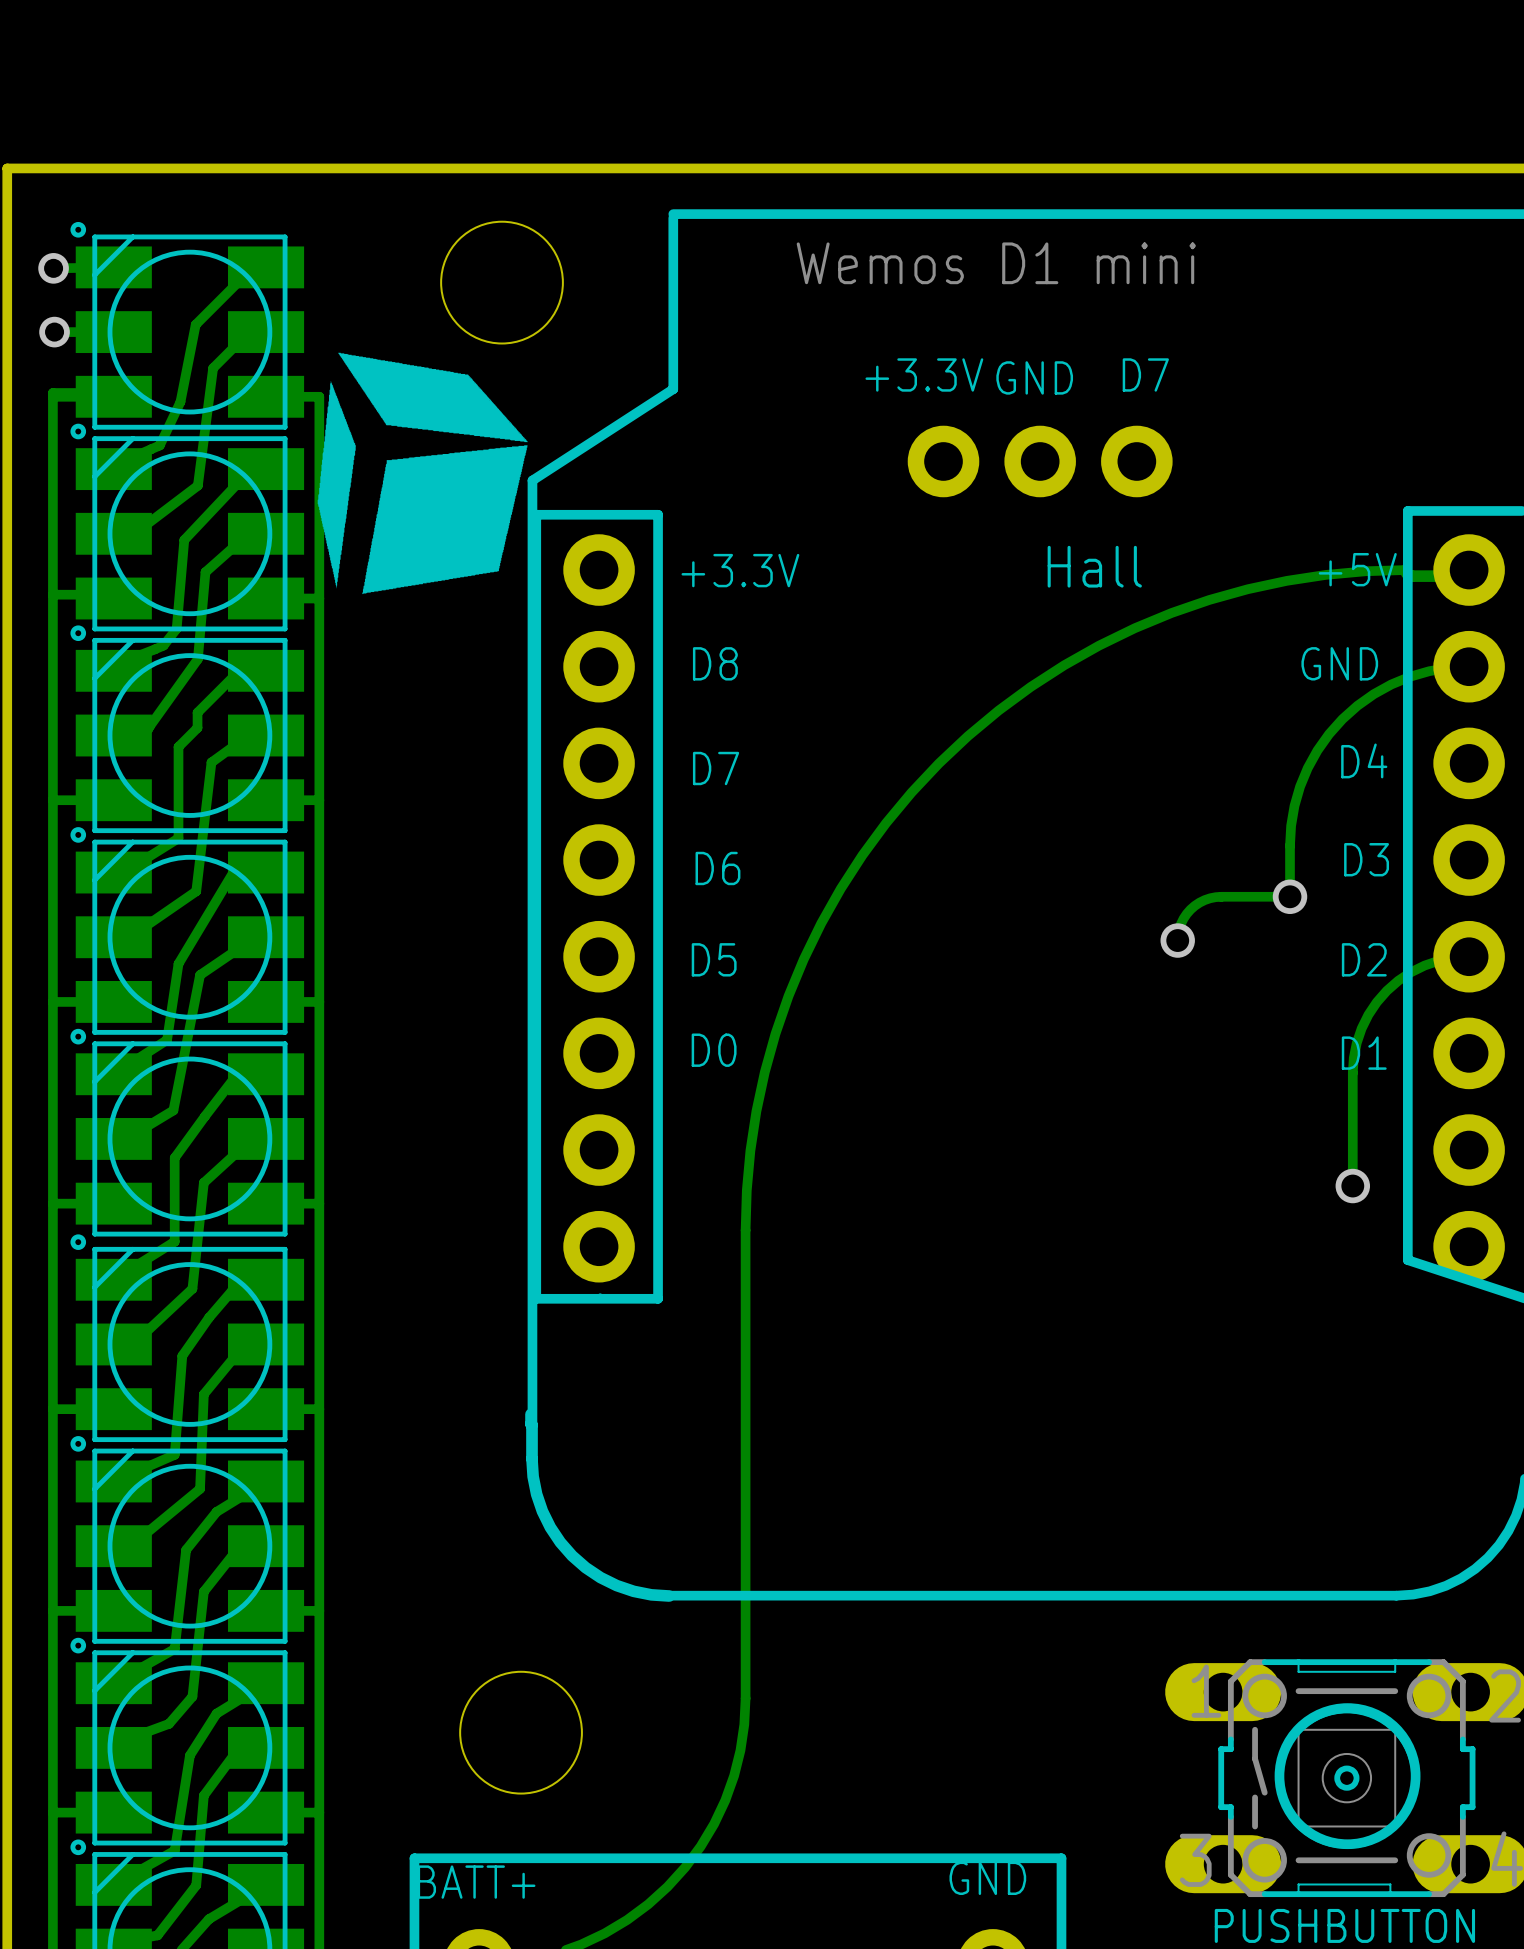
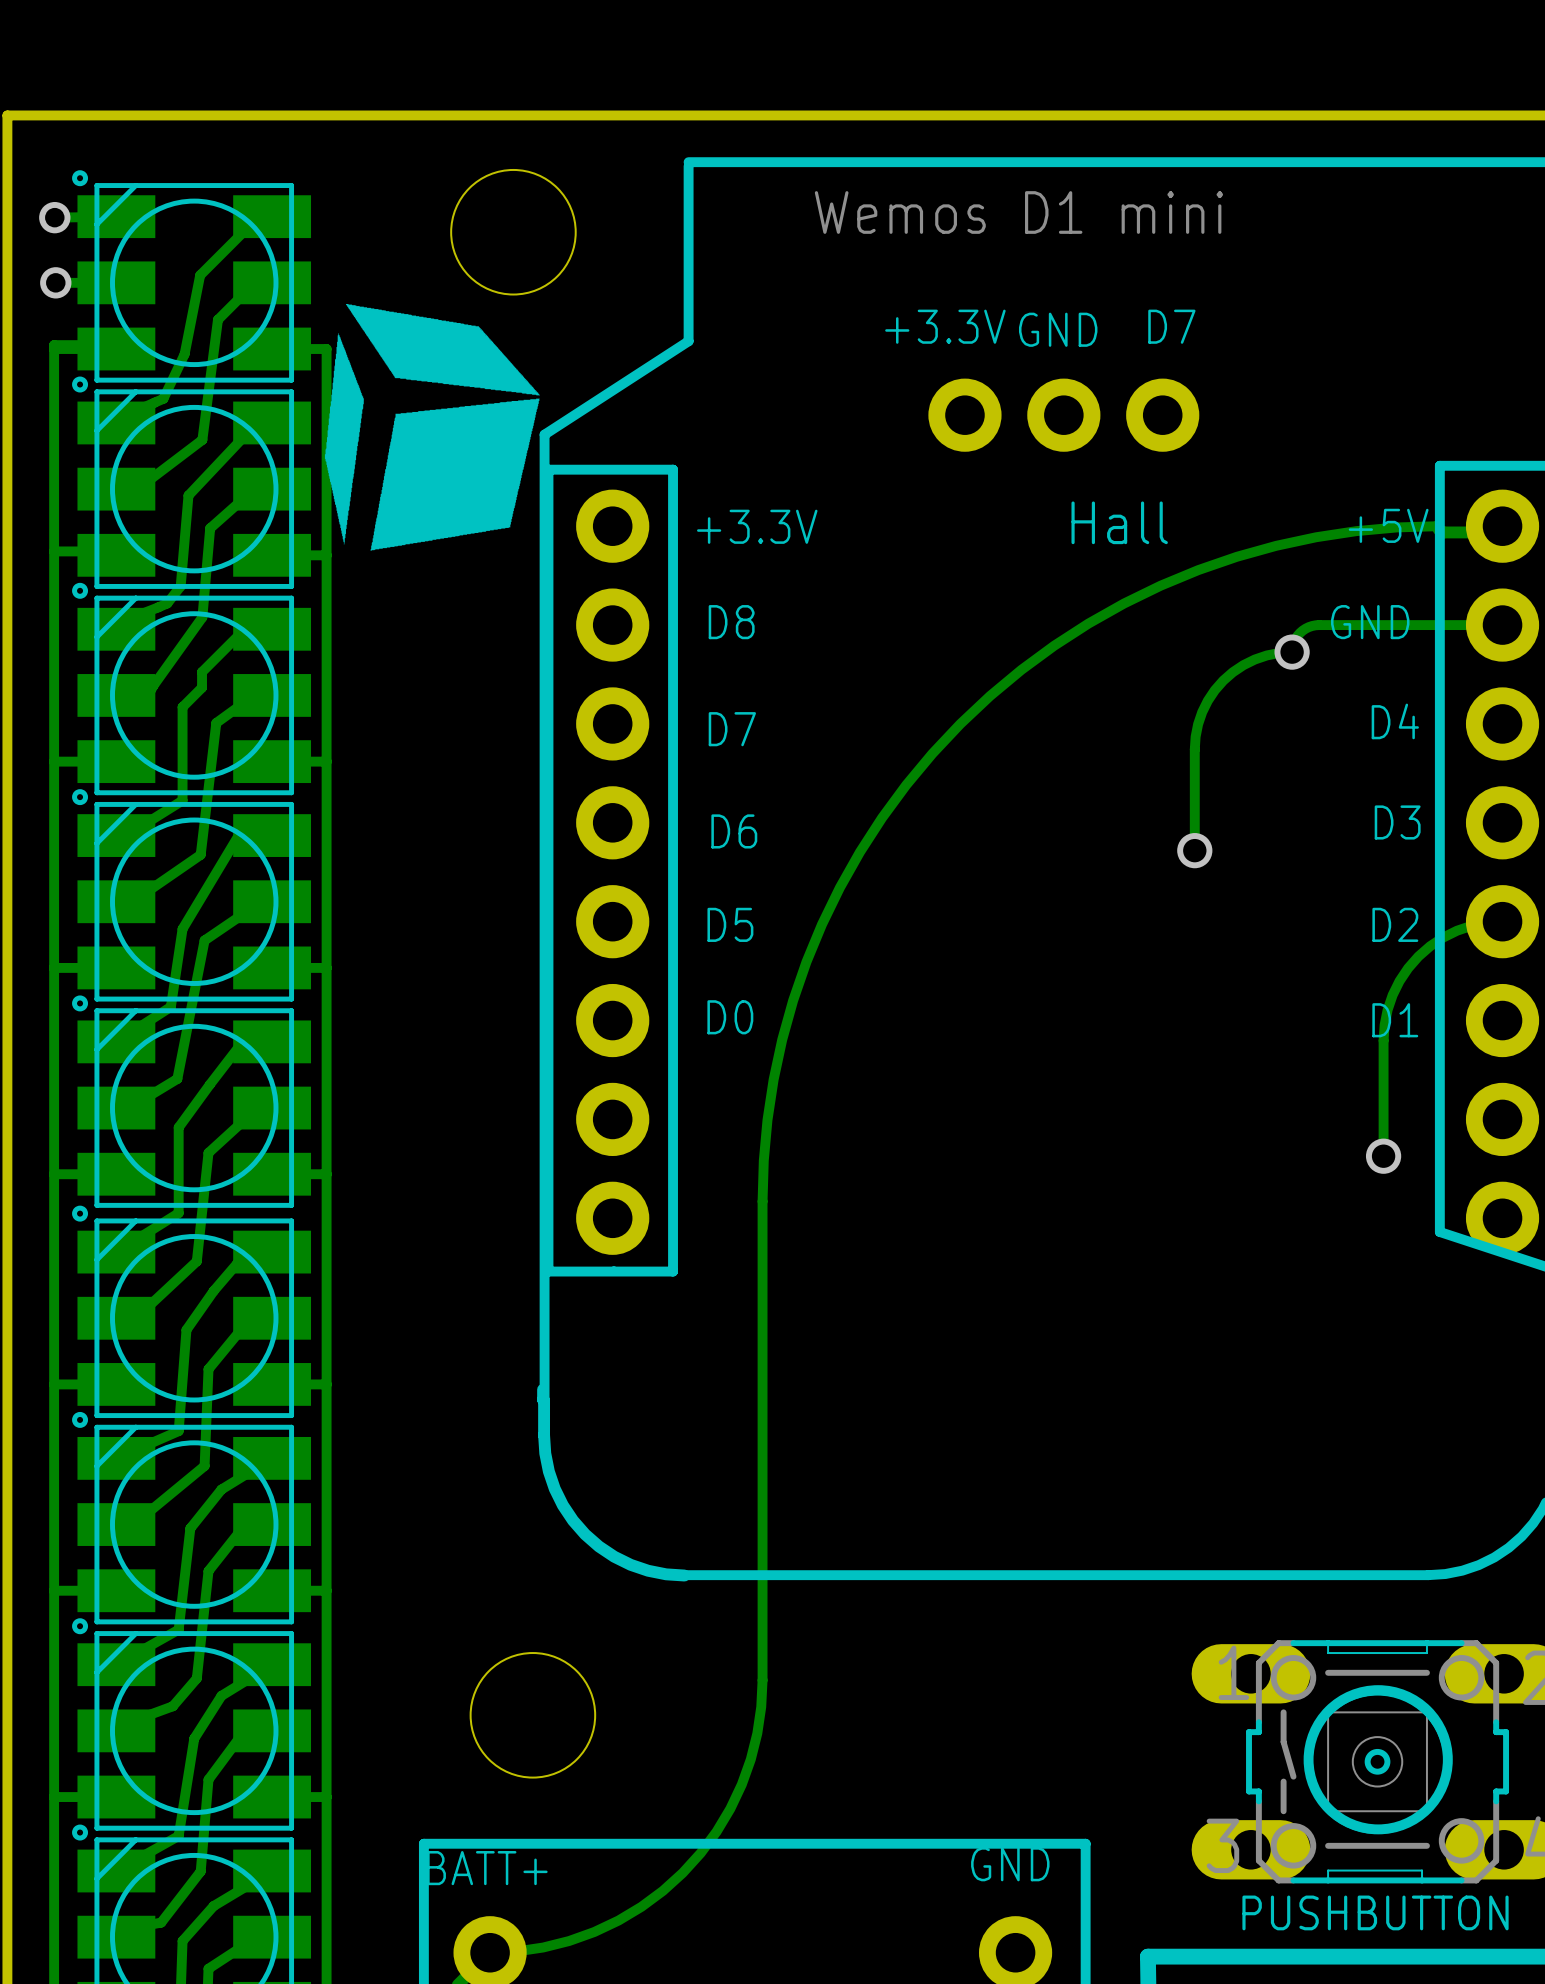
track: (1469, 666) (1429, 671) (1391, 684) (1357, 705) (1342, 719) (1317, 750) (1300, 786) (1291, 825) (1290, 896) (1221, 896) (1204, 900) (1190, 909) (1183, 918) (1177, 940) -> (1502, 625) (1315, 625) (1305, 628) (1297, 635) (1292, 652) (1266, 655) (1254, 659) (1232, 672) (1214, 690) (1207, 700) (1198, 724) (1194, 749) (1194, 850)
via: none -> (1292, 652)
via: (1290, 896) -> none
via position: (1177, 940) -> (1194, 850)

